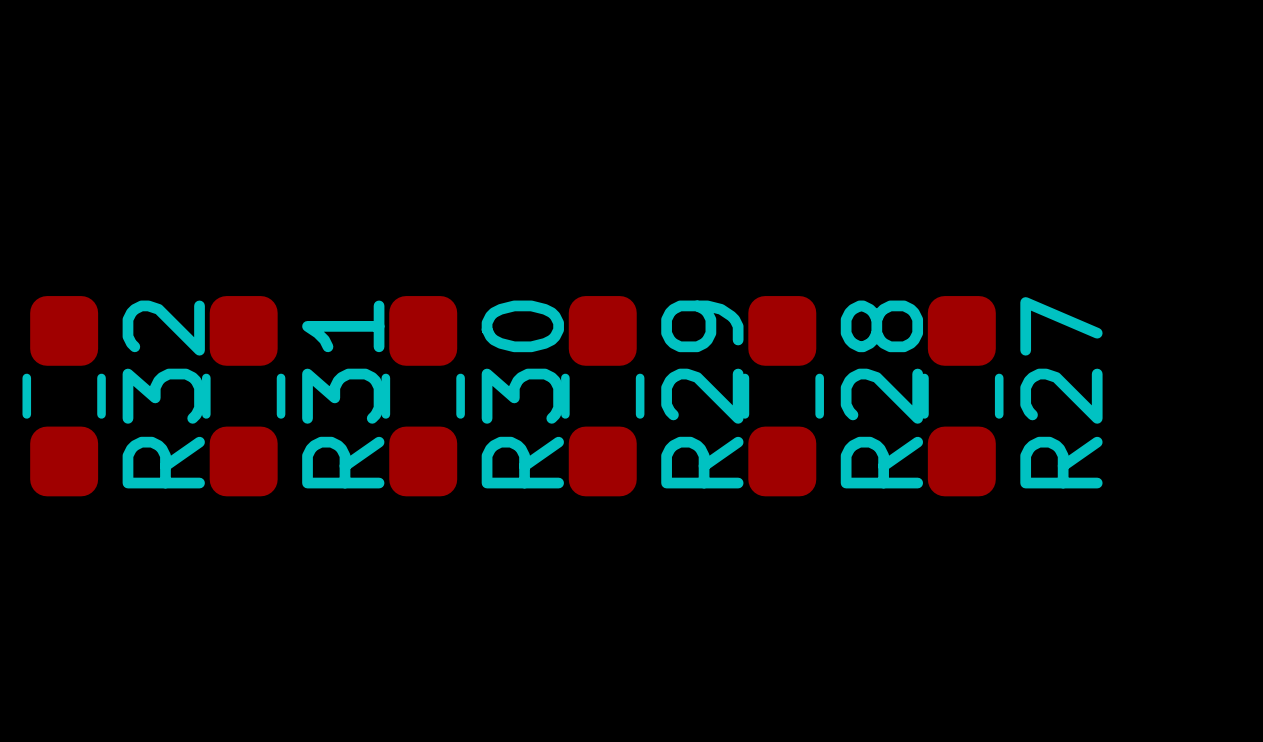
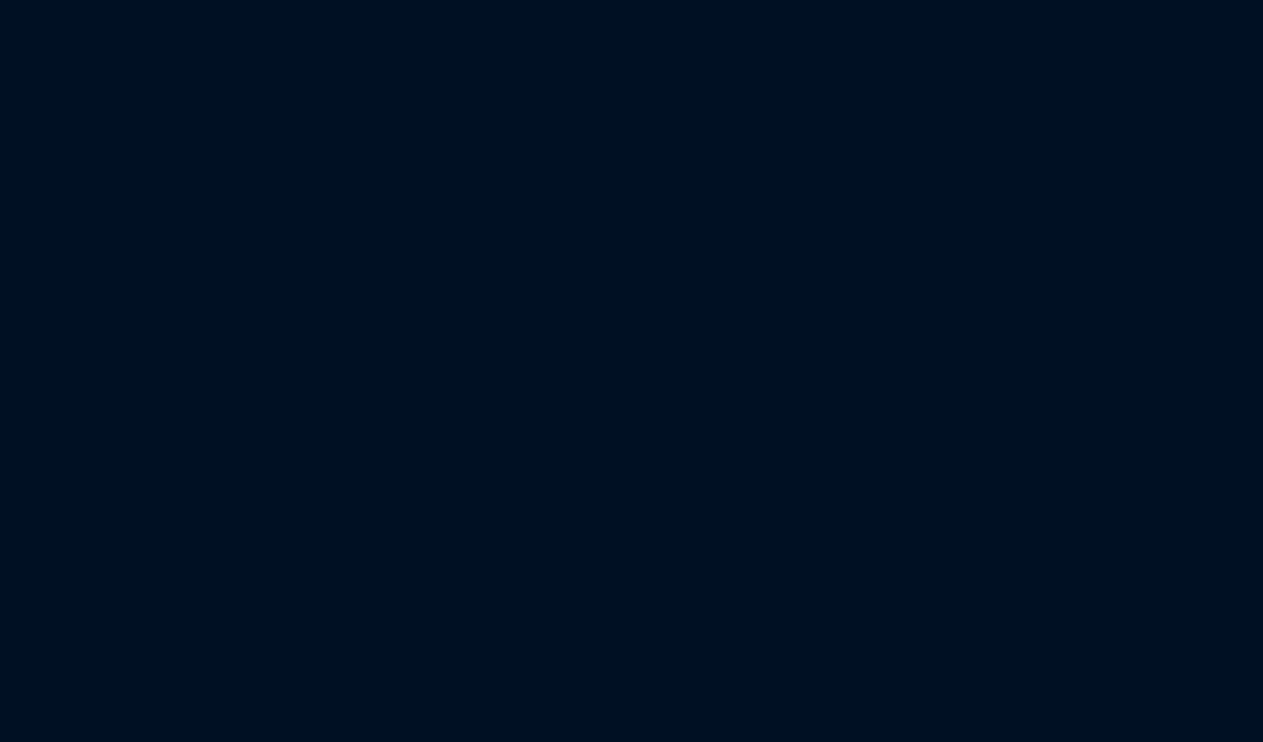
R32: (64, 396) -> none
R31: (243, 396) -> none
R30: (423, 396) -> none
R29: (602, 396) -> none
R28: (782, 396) -> none
R27: (961, 396) -> none

